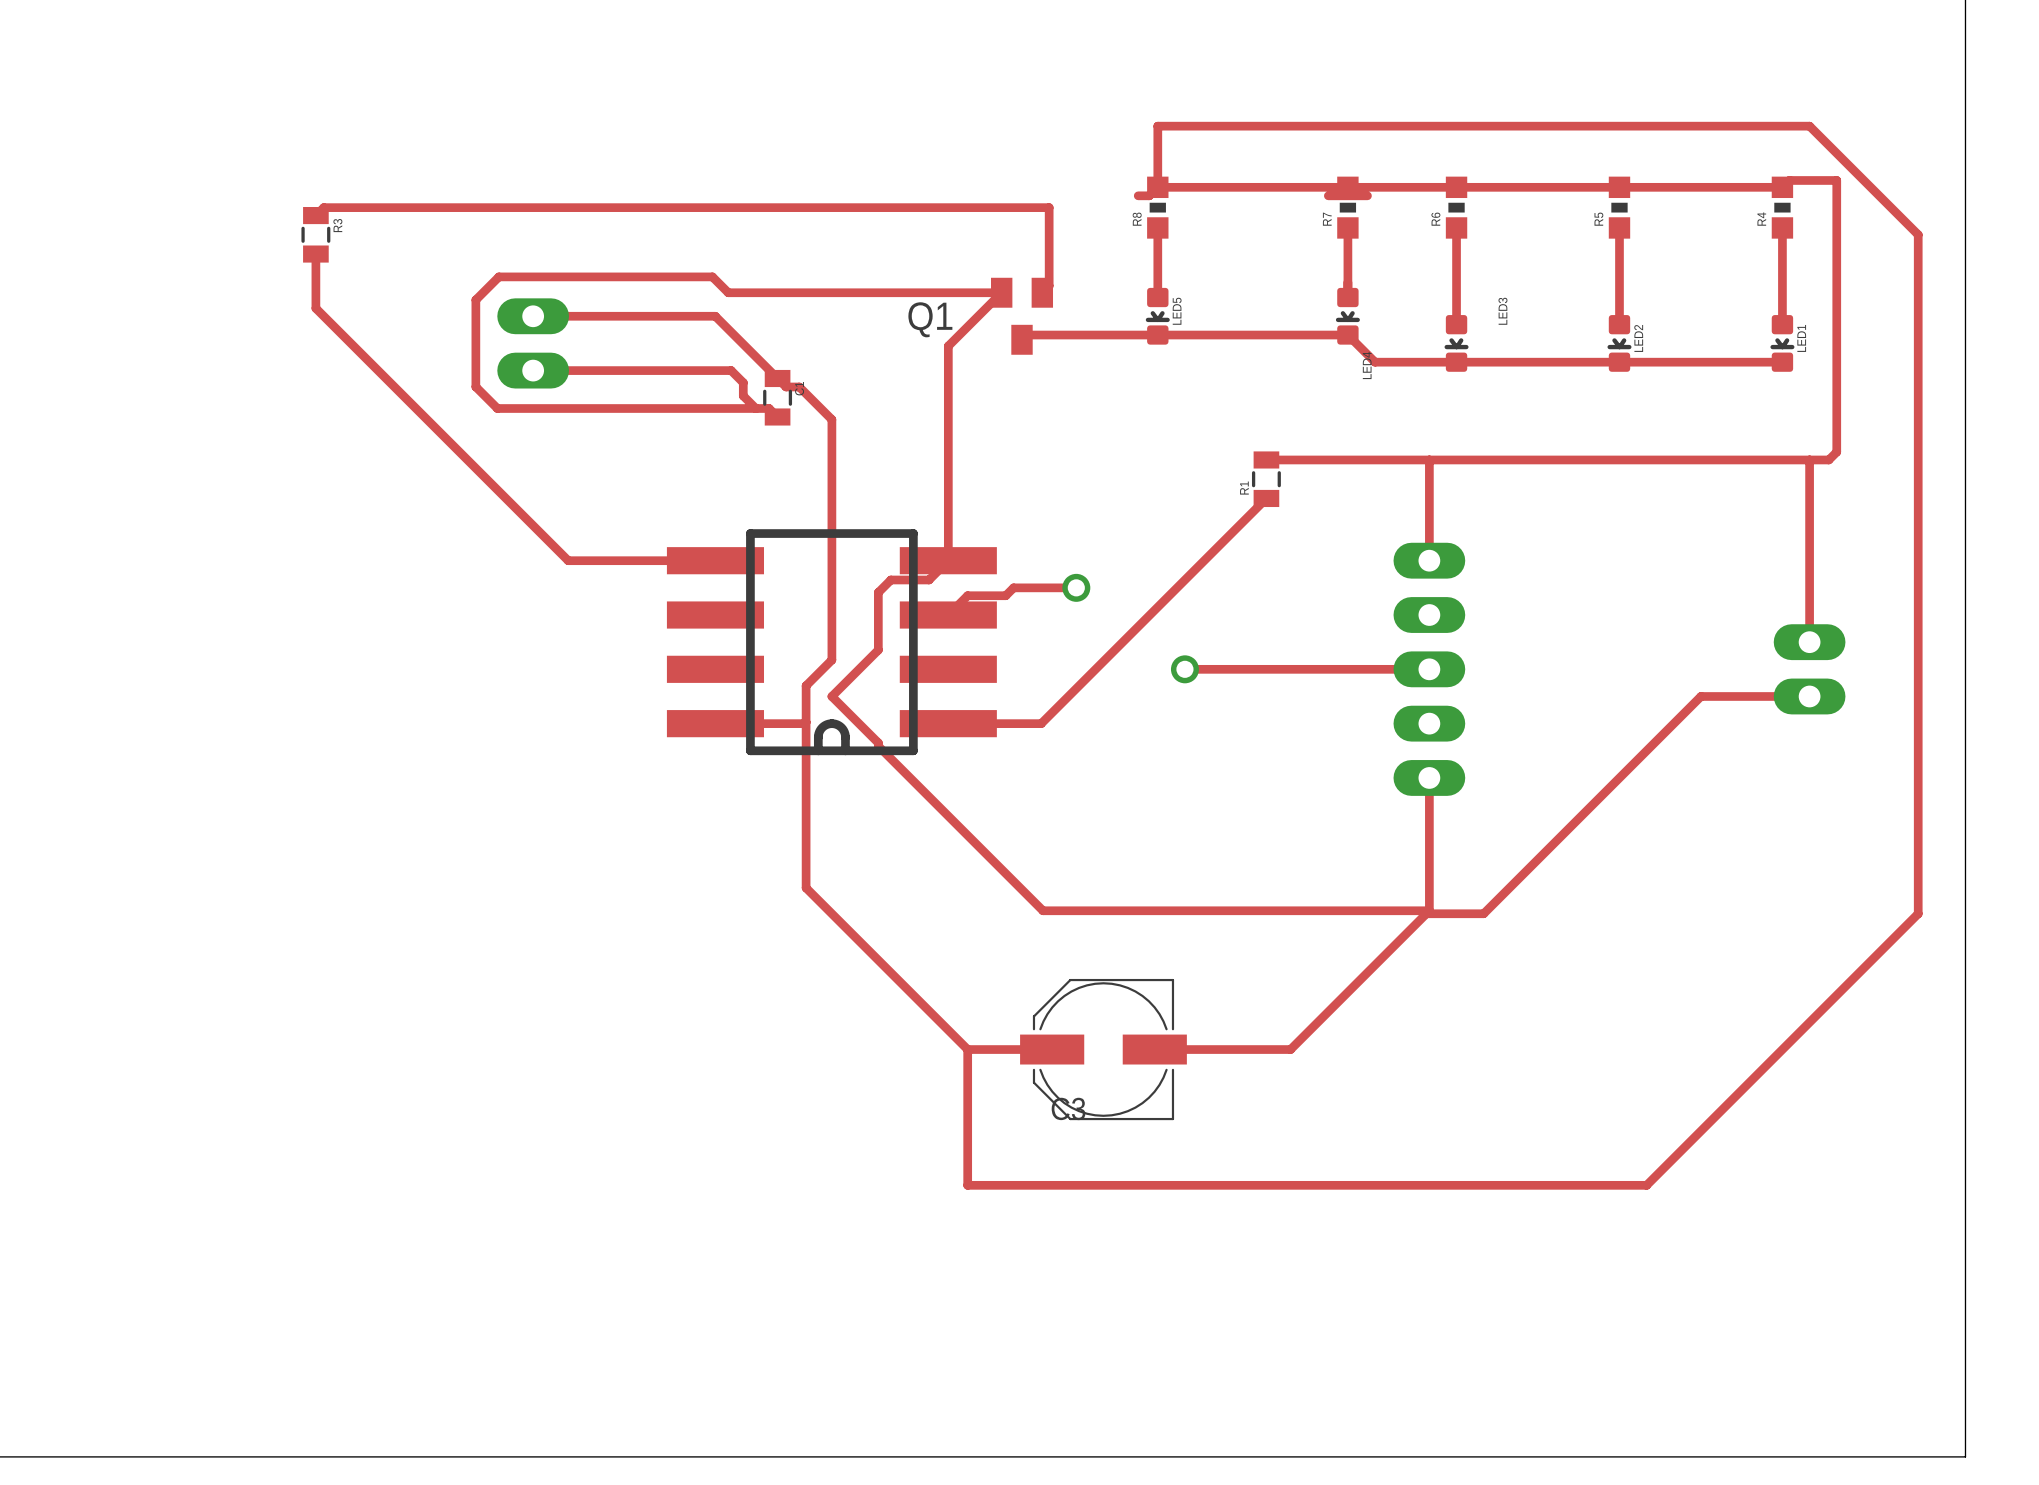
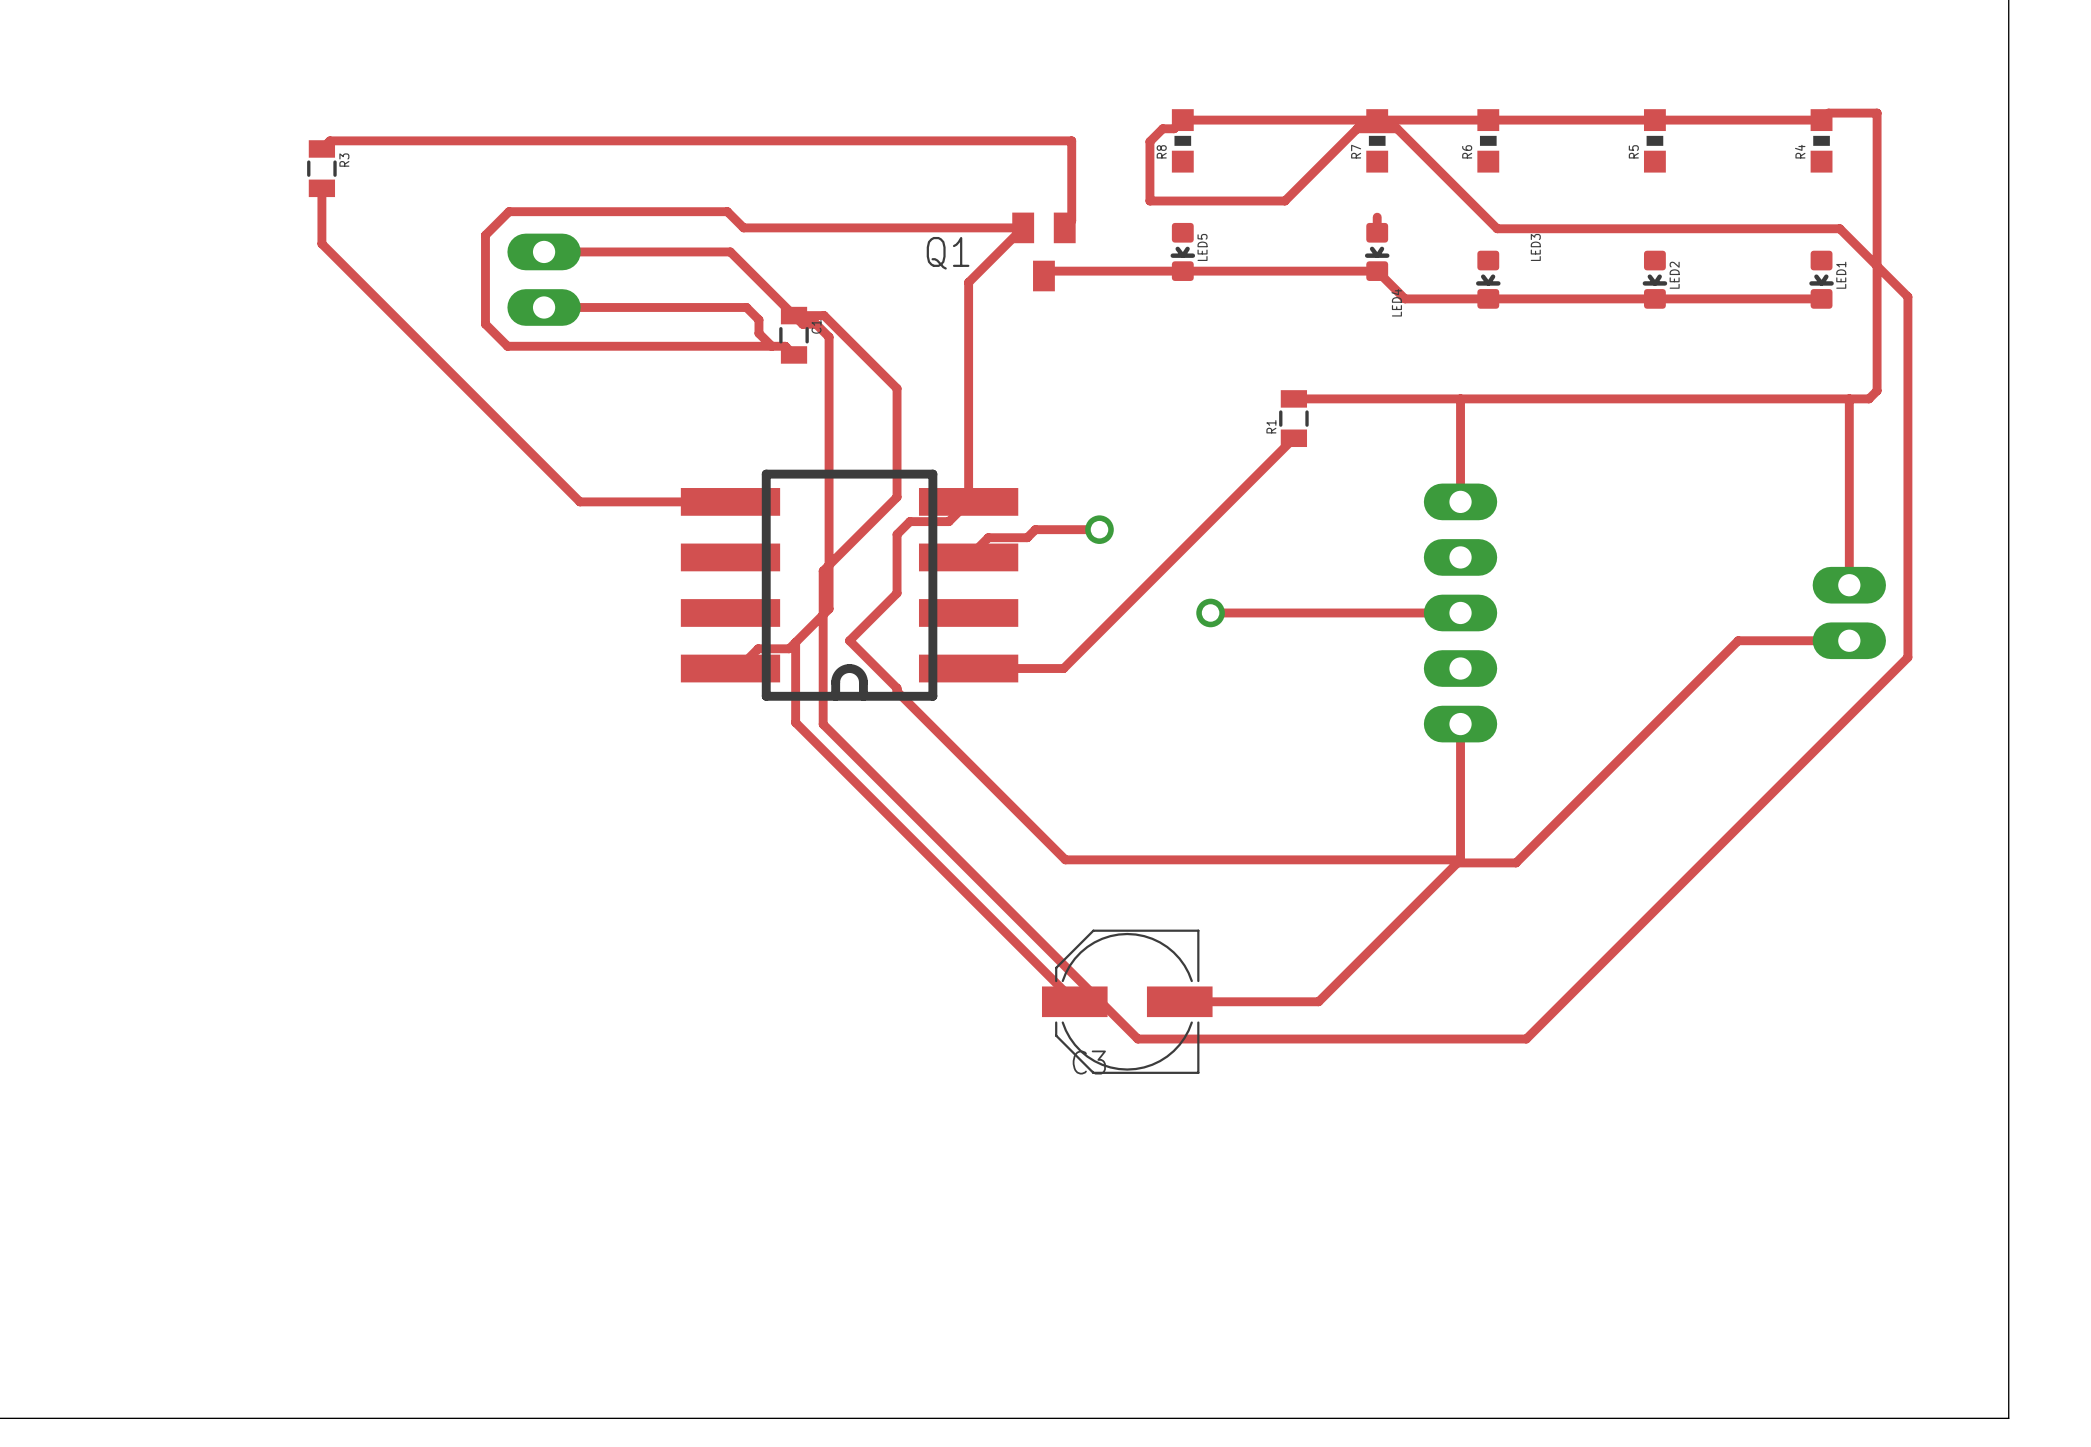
track: (1157, 187) (1157, 126) (1809, 126) (1918, 234) (1918, 913) (1646, 1185) (967, 1185) (967, 1049) -> none
track: none -> (1162, 128) (1149, 141) (1149, 201) (1284, 201) (1357, 128)
track: (1157, 227) (1157, 297) -> none
track: (1347, 227) (1347, 282) -> none
track: (1456, 227) (1456, 324) -> none
track: (1619, 227) (1619, 324) -> none
track: (1782, 227) (1782, 324) -> none
track: (811, 399) (831, 419) (831, 660) (806, 685) -> (794, 315) (824, 315) (897, 388) (897, 497) (823, 571) (823, 629)
track: (806, 722) (723, 723) -> (829, 337) (829, 608) (789, 648) (758, 648) (738, 668)
track: (806, 778) (806, 887) (967, 1049) -> (823, 724) (1137, 1039) (1526, 1039) (1907, 657) (1907, 296) (1839, 228) (1497, 228) (1397, 128)
track: (967, 1049) (1052, 1049) -> (795, 642) (795, 722) (1074, 1001)

